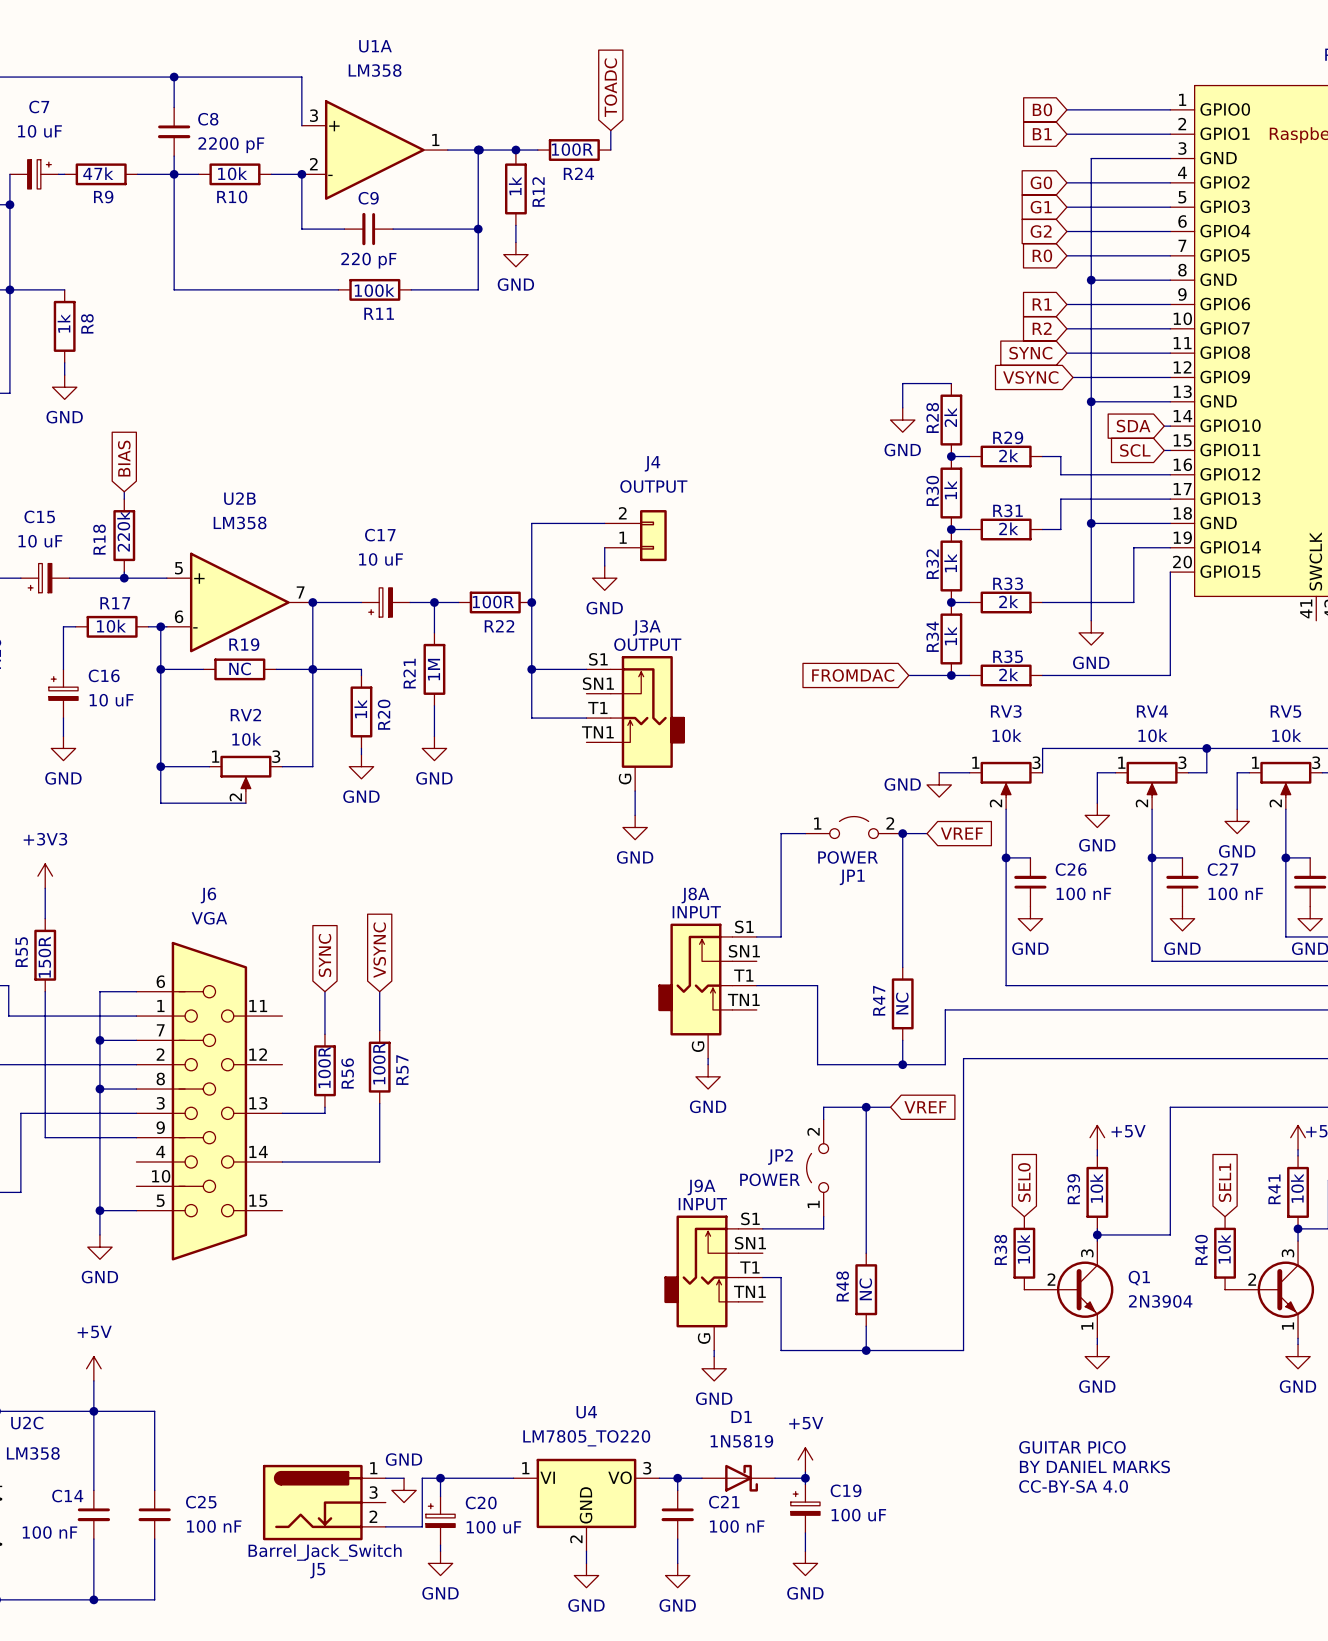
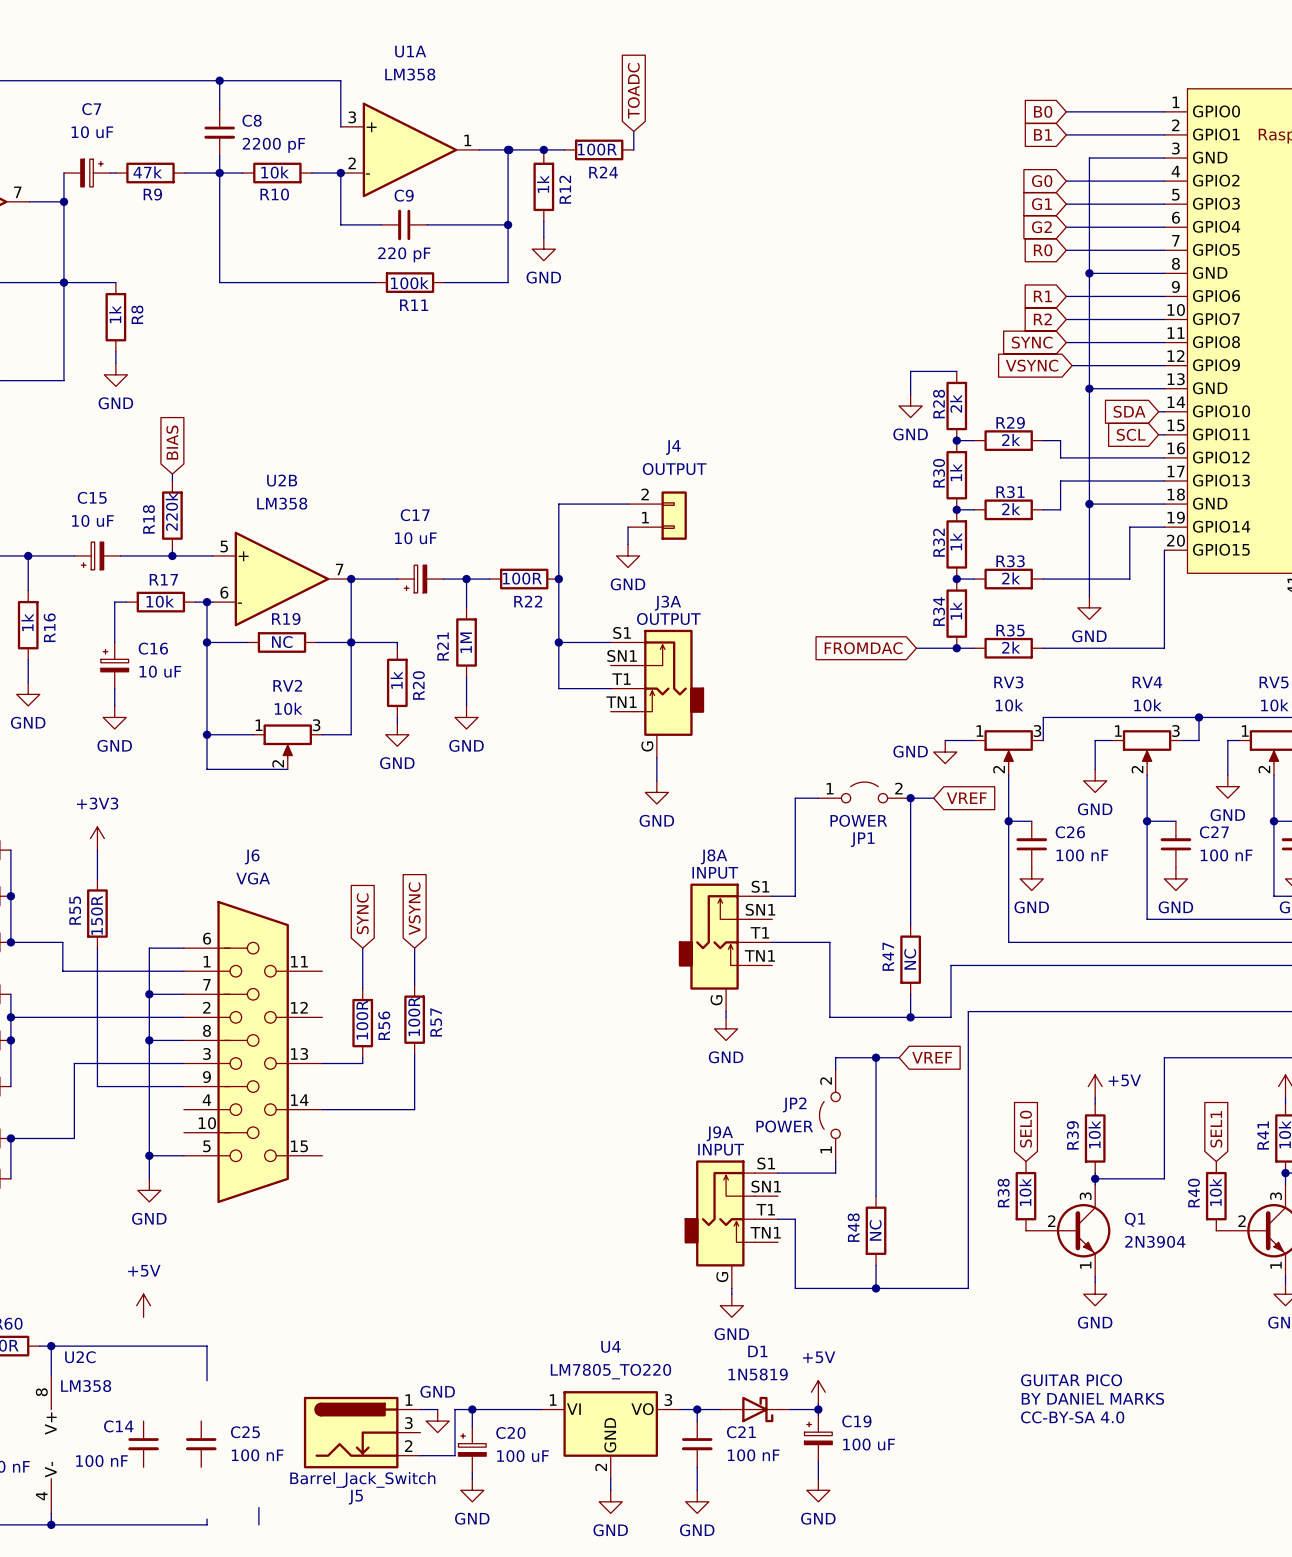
wire: (93, 1380) (93, 1490) -> none
junction: (93, 1411) -> none
wire: (154, 1411) (154, 1490) -> (201, 1346) (207, 1346) (207, 1380)
wire: (93, 1539) (93, 1599) -> none
wire: (154, 1539) (154, 1599) -> (207, 1519) (207, 1524) (201, 1524)
wire: none -> (258, 1507) (258, 1524)
junction: (93, 1599) -> none

